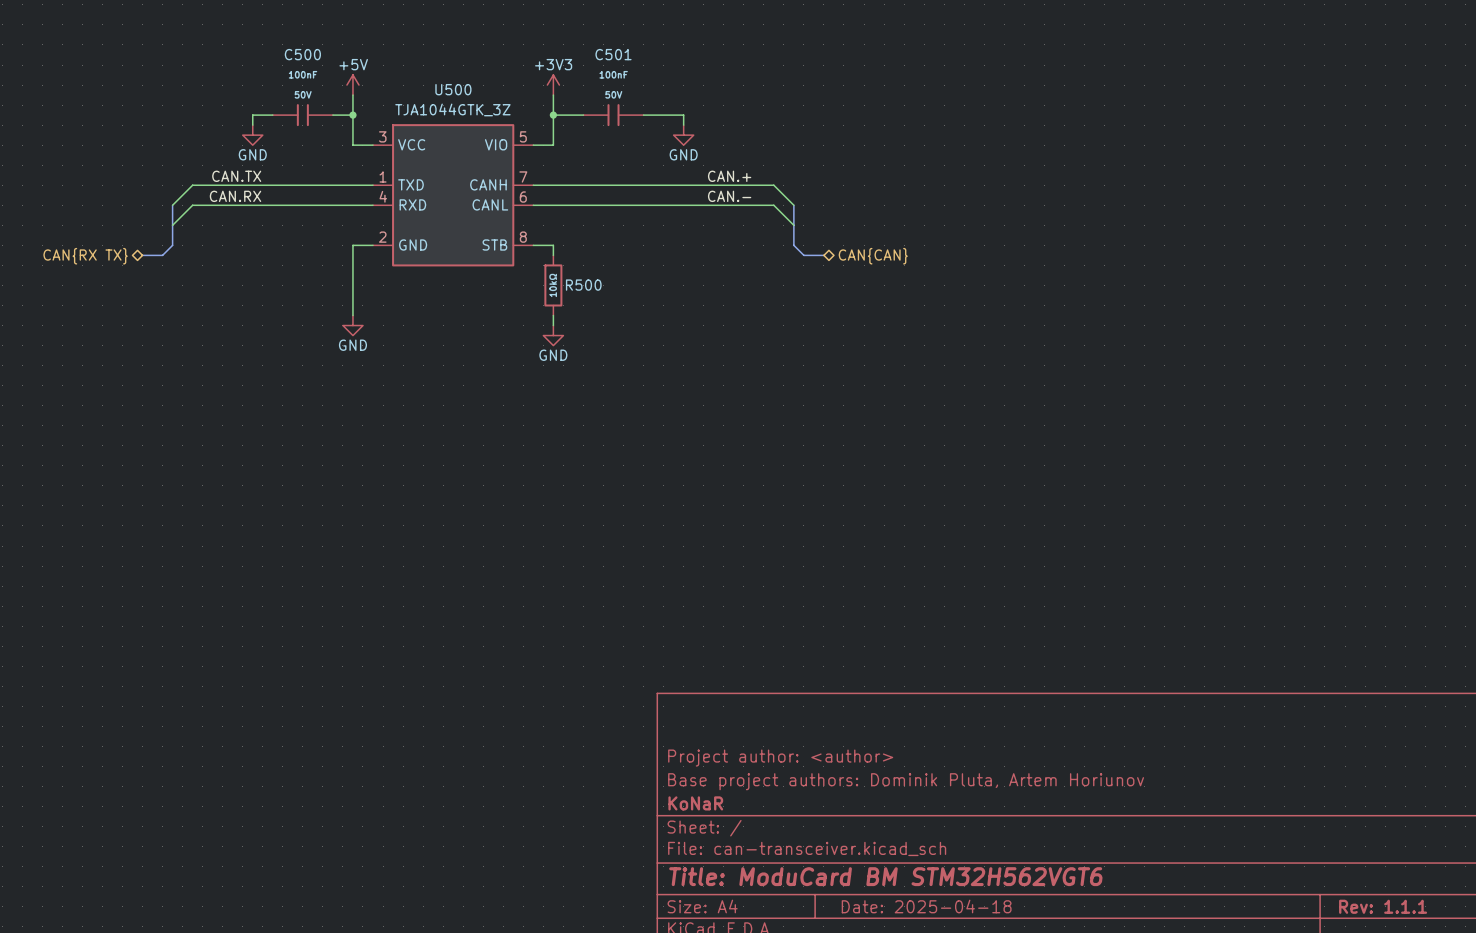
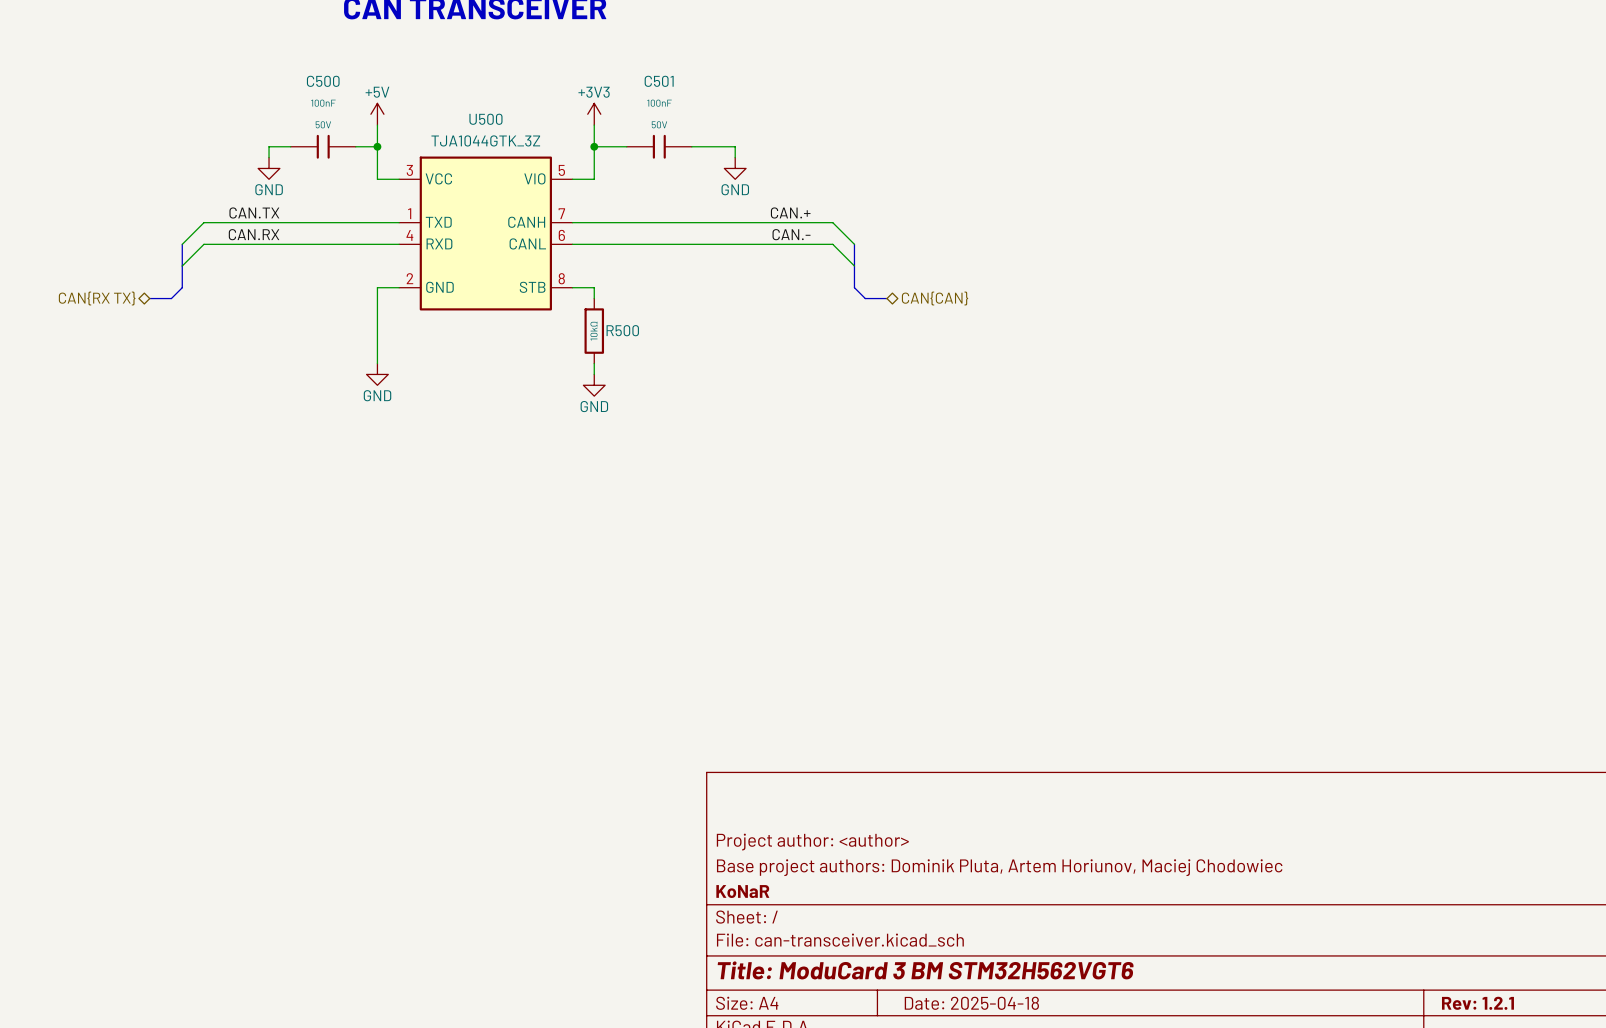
title block: Base project authors: Dominik Pluta, Artem Horiunov (906, 781) -> Base project authors: Dominik Pluta, Artem Horiunov, Maciej Chodowiec (999, 867)
title block: Title: ModuCard BM STM32H562VGT6 (885, 876) -> Title: ModuCard 3 BM STM32H562VGT6 (925, 970)
title block: Rev: 1.1.1 (1383, 906) -> Rev: 1.2.1 (1477, 1003)

